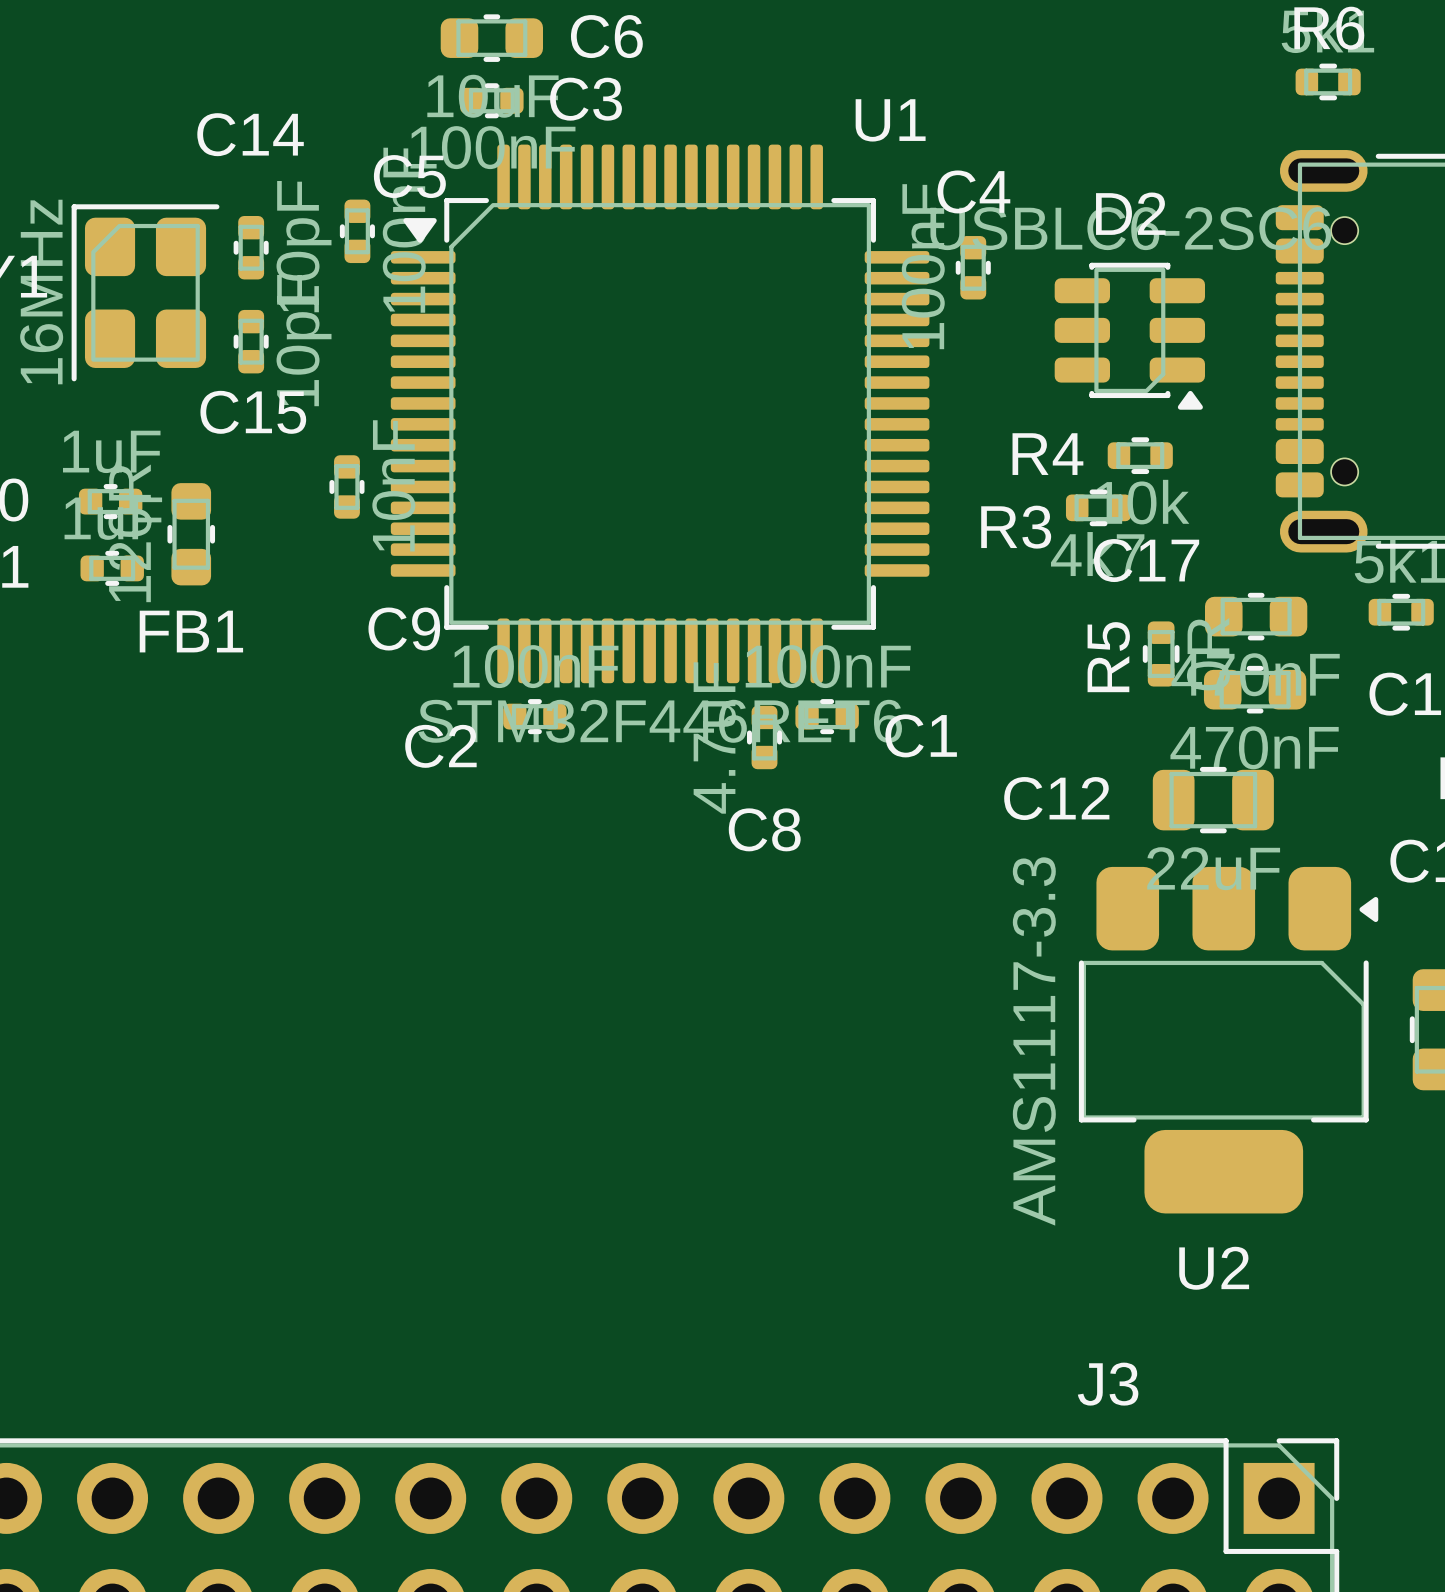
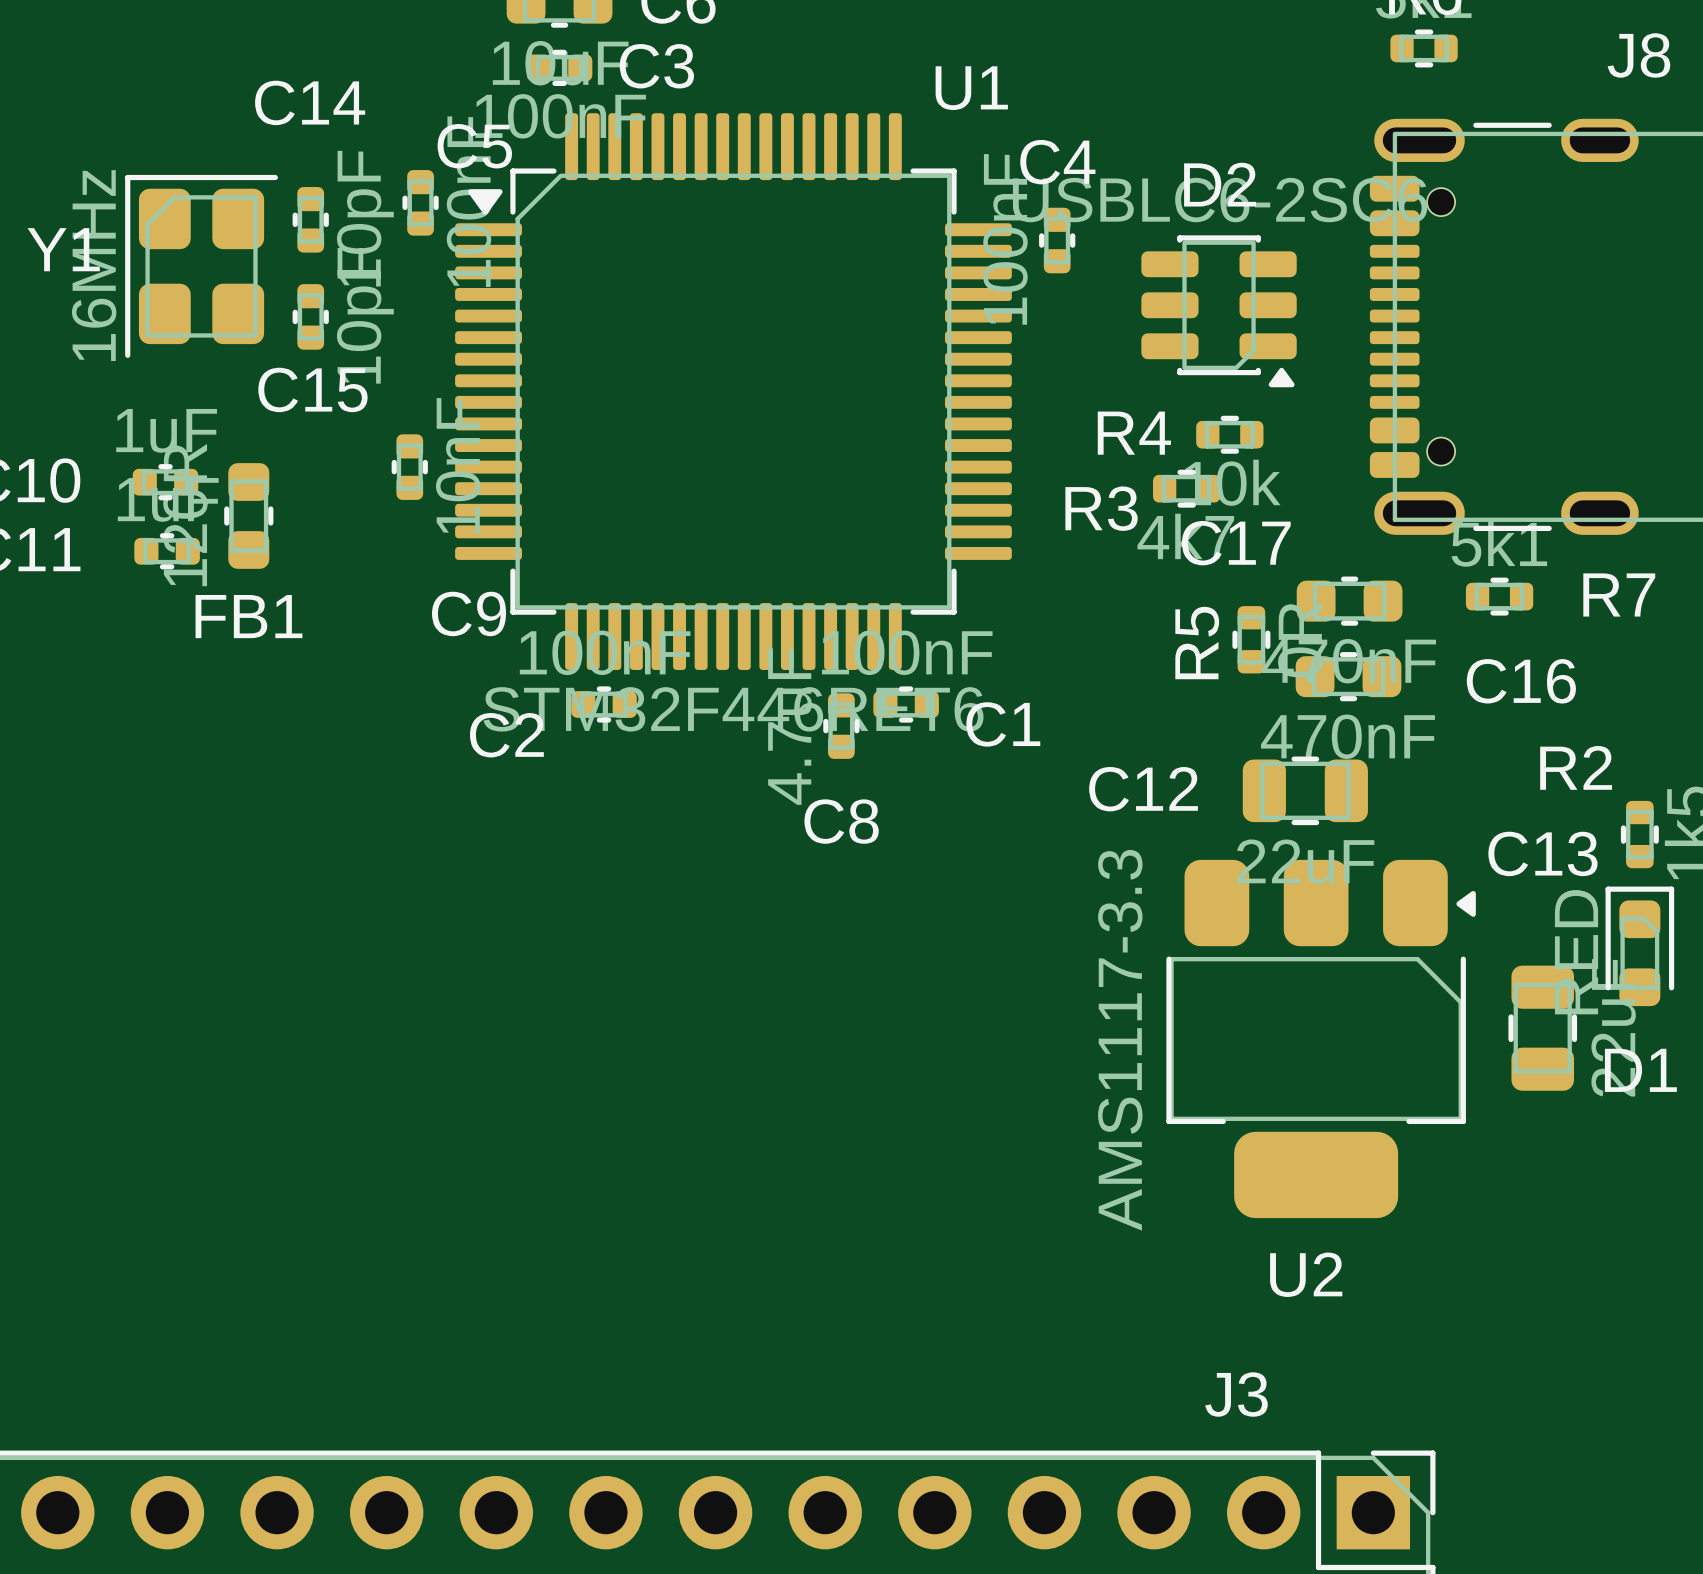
J3 name position: J3 (1108, 1384) -> J3 (1236, 1394)

